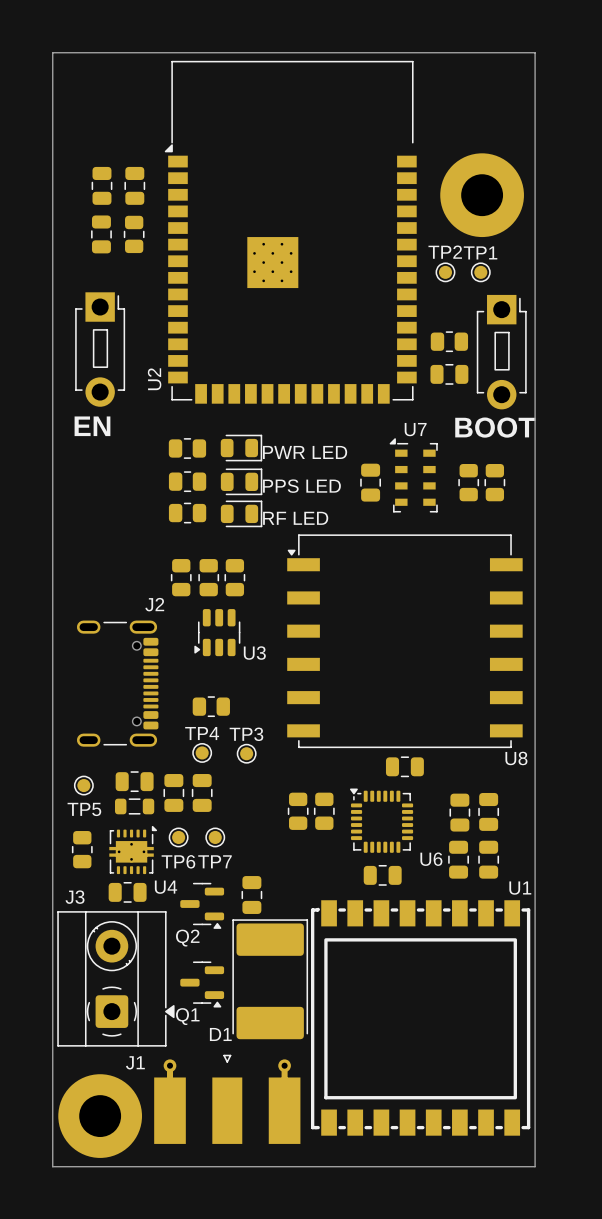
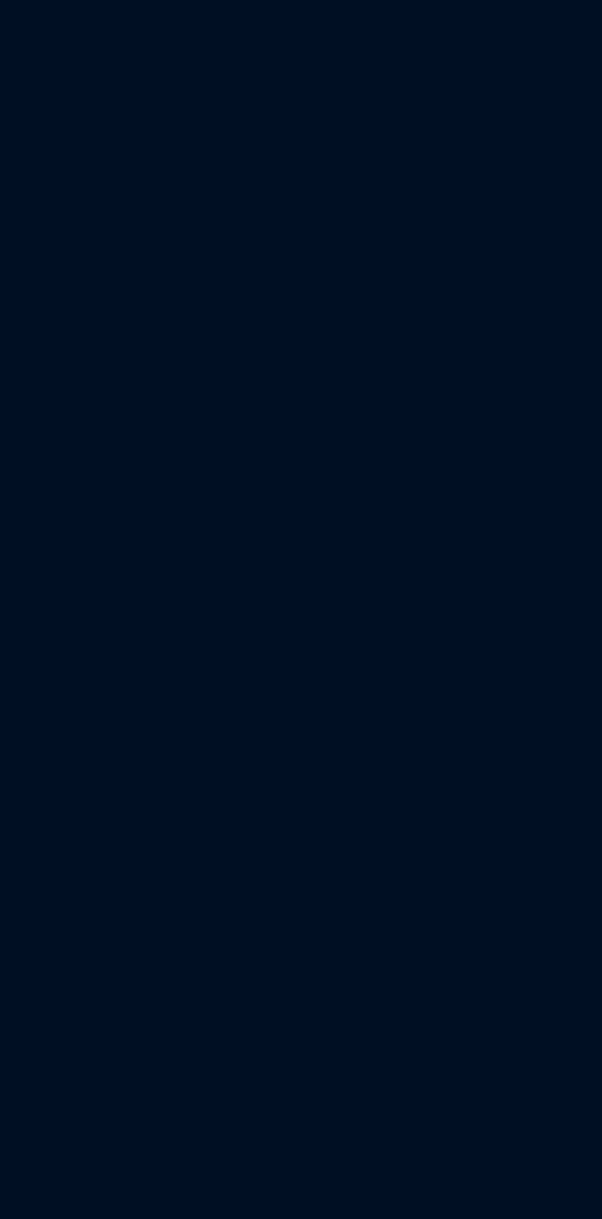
board edge: (52, 52) (535, 52) (535, 1166) (52, 1166) (52, 52) -> none
part: (101, 185) -> none
part: (134, 185) -> none
part: (482, 195) -> none
U2: (290, 232) -> none
part: (101, 234) -> none
part: (134, 234) -> none
TP2: (445, 272) -> none
TP1: (480, 272) -> none
part: (449, 341) -> none
part: (100, 349) -> none
part: (501, 352) -> none
part: (449, 374) -> none
text: EN (92, 426) -> none
text: BOOT (495, 427) -> none
part: (187, 448) -> none
part: (241, 448) -> none
text: PWR LED (305, 452) -> none
U7: (413, 475) -> none
part: (187, 481) -> none
part: (241, 481) -> none
part: (370, 482) -> none
part: (468, 482) -> none
part: (494, 482) -> none
text: PPS LED (301, 486) -> none
part: (187, 513) -> none
part: (241, 513) -> none
text: RF LED (295, 518) -> none
part: (181, 577) -> none
part: (208, 577) -> none
part: (234, 577) -> none
U3: (217, 632) -> none
U8: (404, 641) -> none
J2: (117, 683) -> none
part: (211, 706) -> none
TP4: (202, 752) -> none
TP3: (246, 753) -> none
part: (404, 766) -> none
part: (134, 781) -> none
TP5: (83, 785) -> none
part: (173, 792) -> none
part: (202, 792) -> none
part: (134, 806) -> none
part: (298, 811) -> none
part: (324, 811) -> none
part: (488, 811) -> none
part: (459, 812) -> none
U6: (381, 820) -> none
TP6: (178, 837) -> none
TP7: (215, 837) -> none
part: (82, 849) -> none
U4: (133, 850) -> none
part: (458, 859) -> none
part: (488, 859) -> none
part: (382, 875) -> none
part: (127, 892) -> none
part: (251, 895) -> none
Q2: (202, 905) -> none
J3: (115, 978) -> none
D1: (270, 979) -> none
Q1: (202, 984) -> none
U1: (420, 1017) -> none
J1: (227, 1099) -> none
part: (100, 1116) -> none

